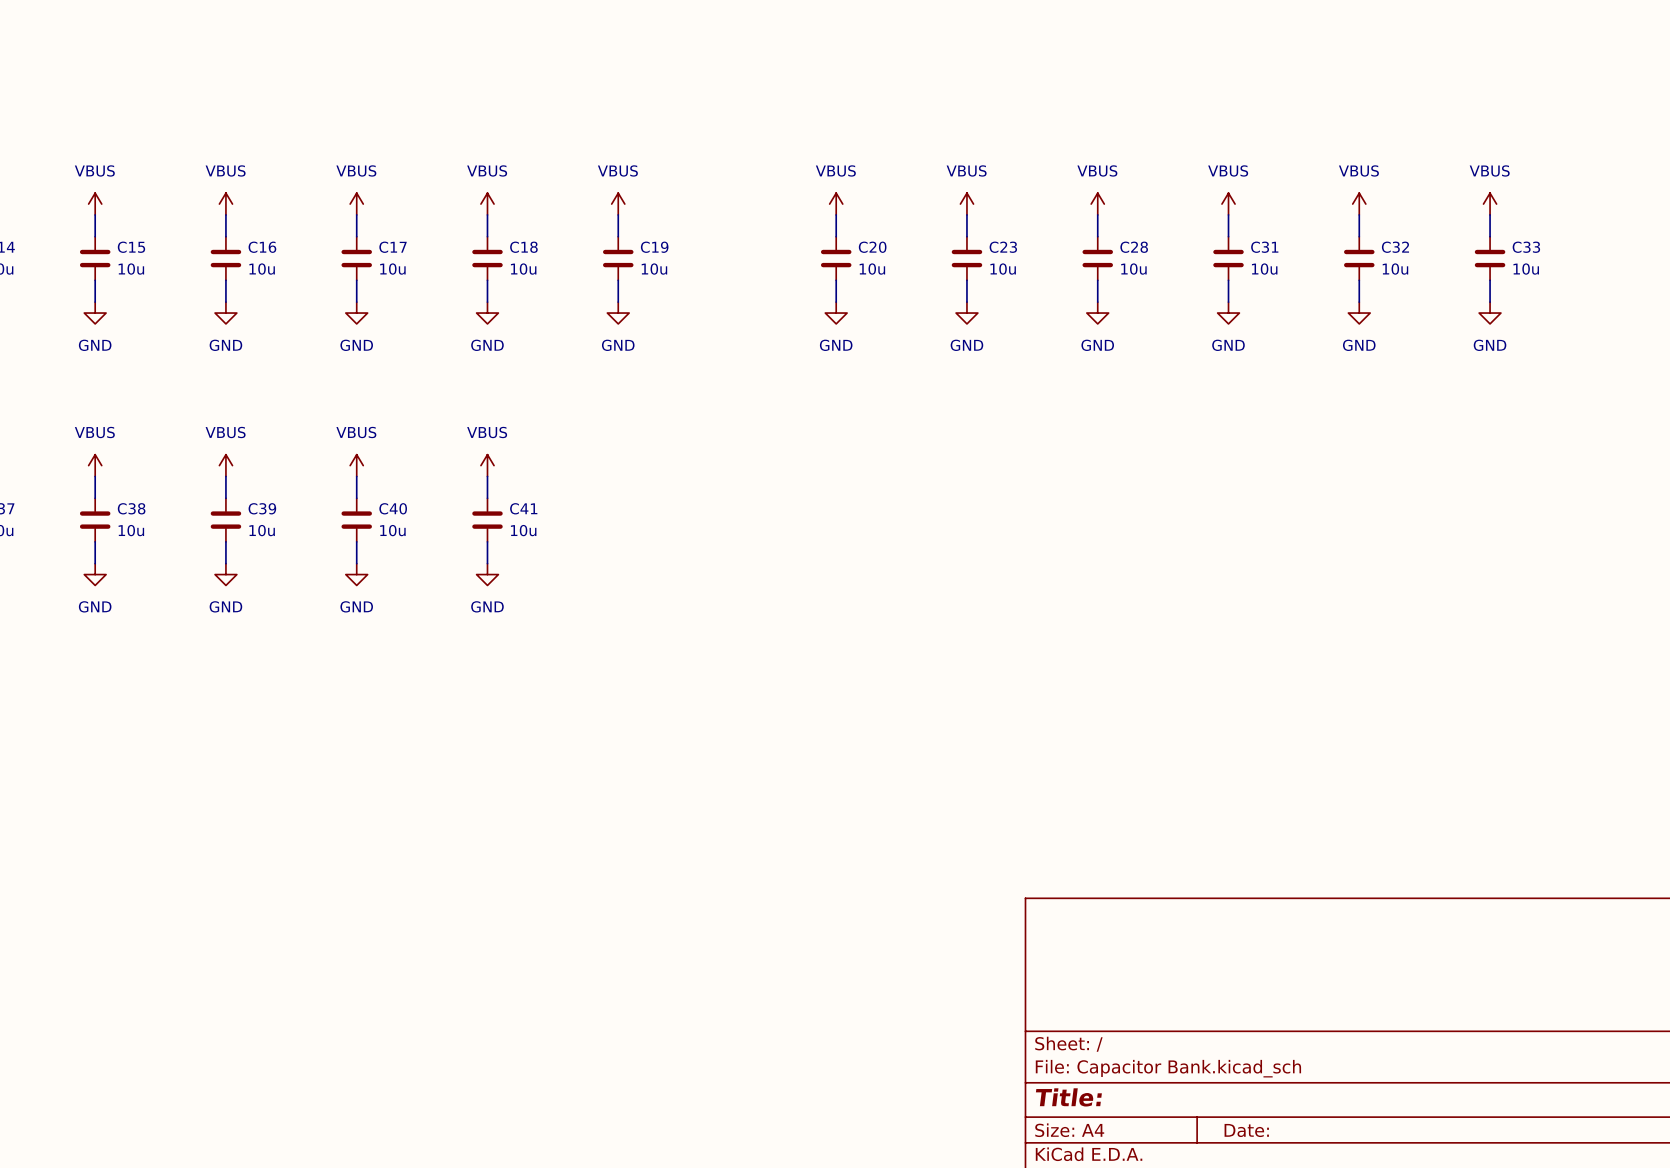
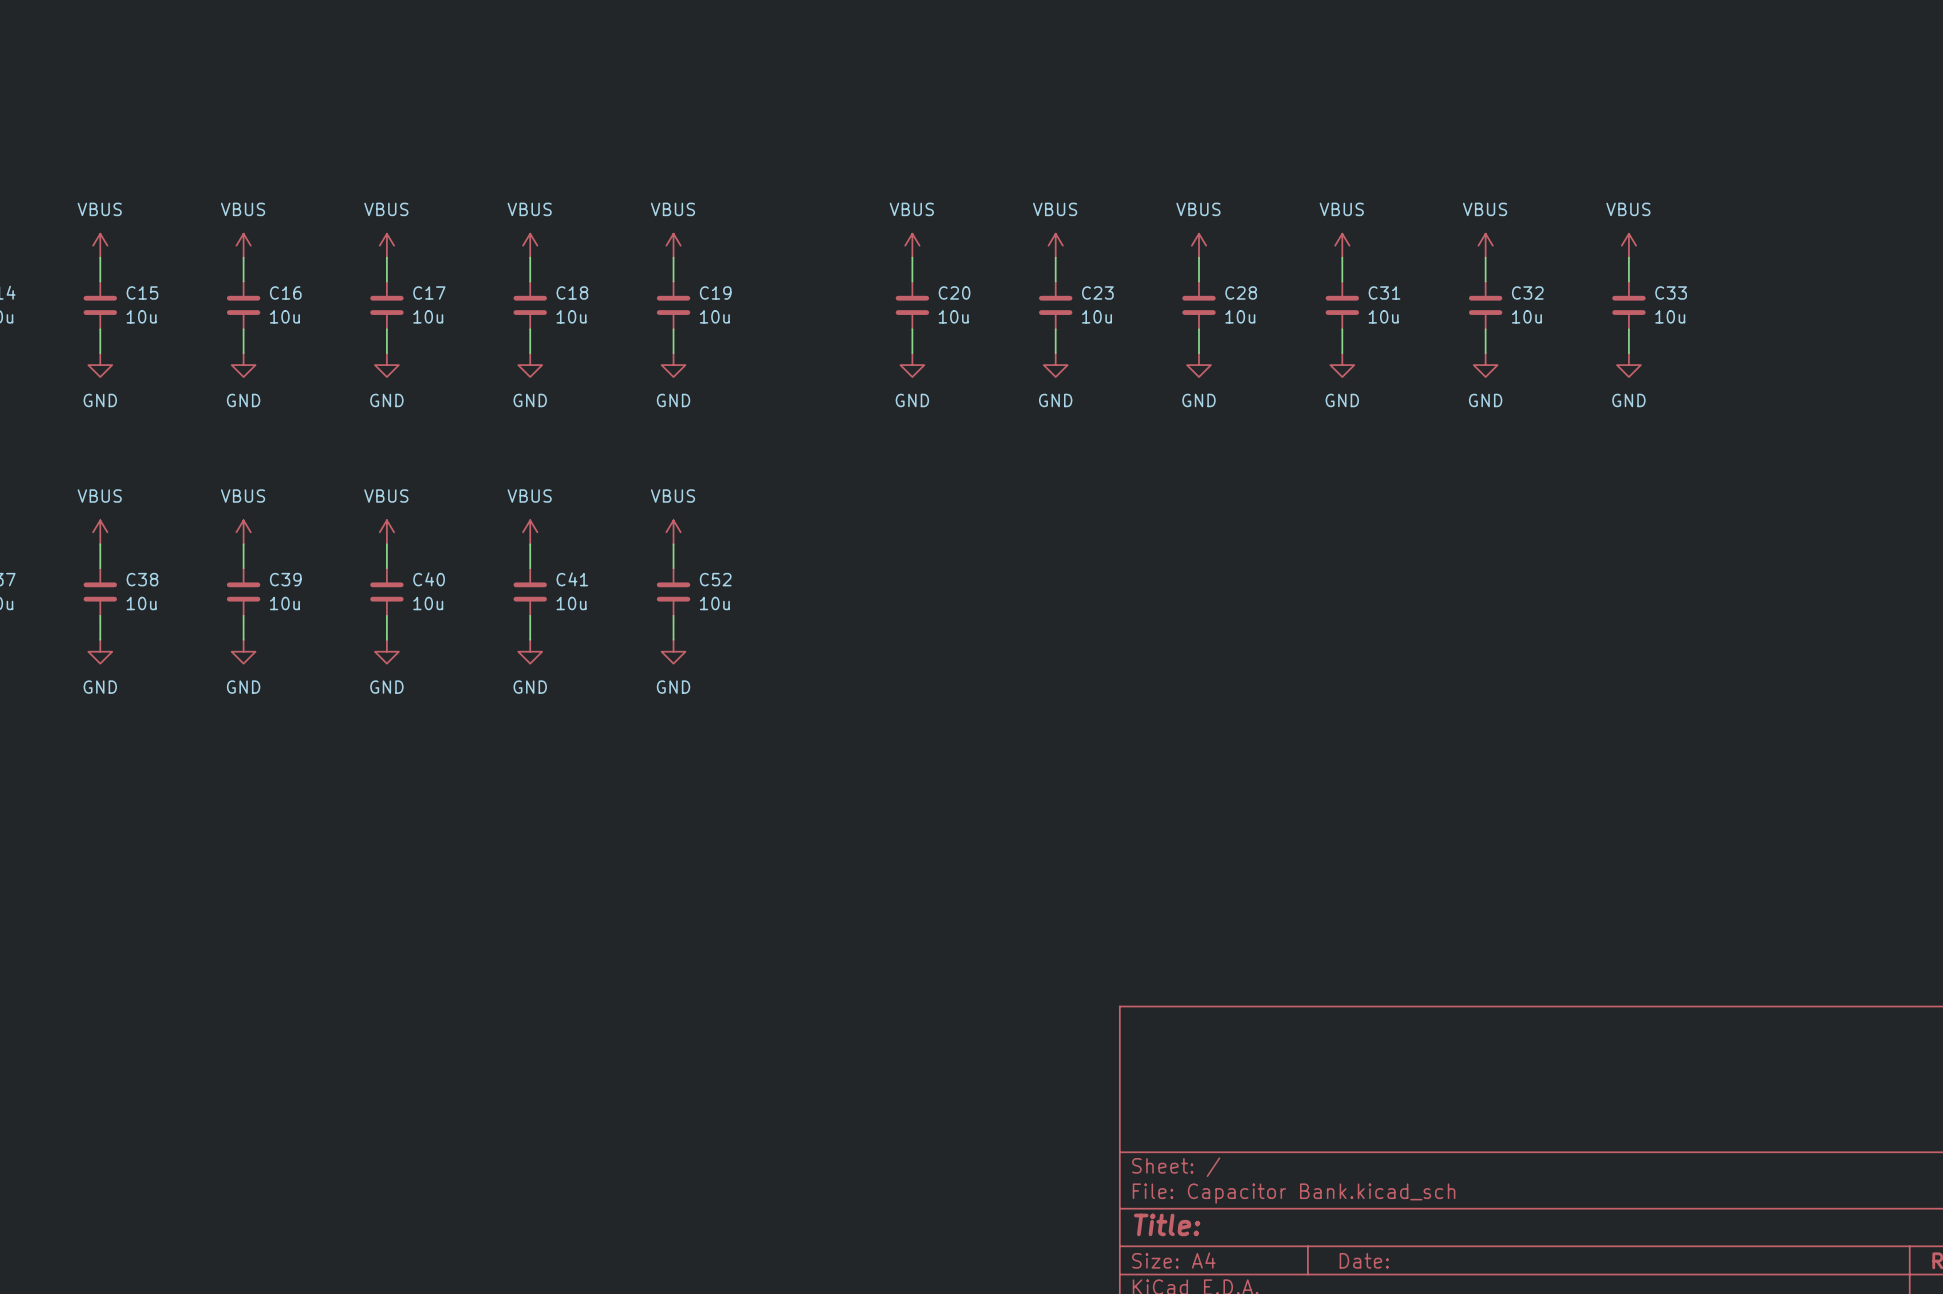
power symbol: none -> VBUS (673, 532)
wire: none -> (673, 544) (673, 568)
C52: none -> 10u (673, 592)
wire: none -> (673, 615) (673, 639)
power symbol: none -> GND (673, 651)

